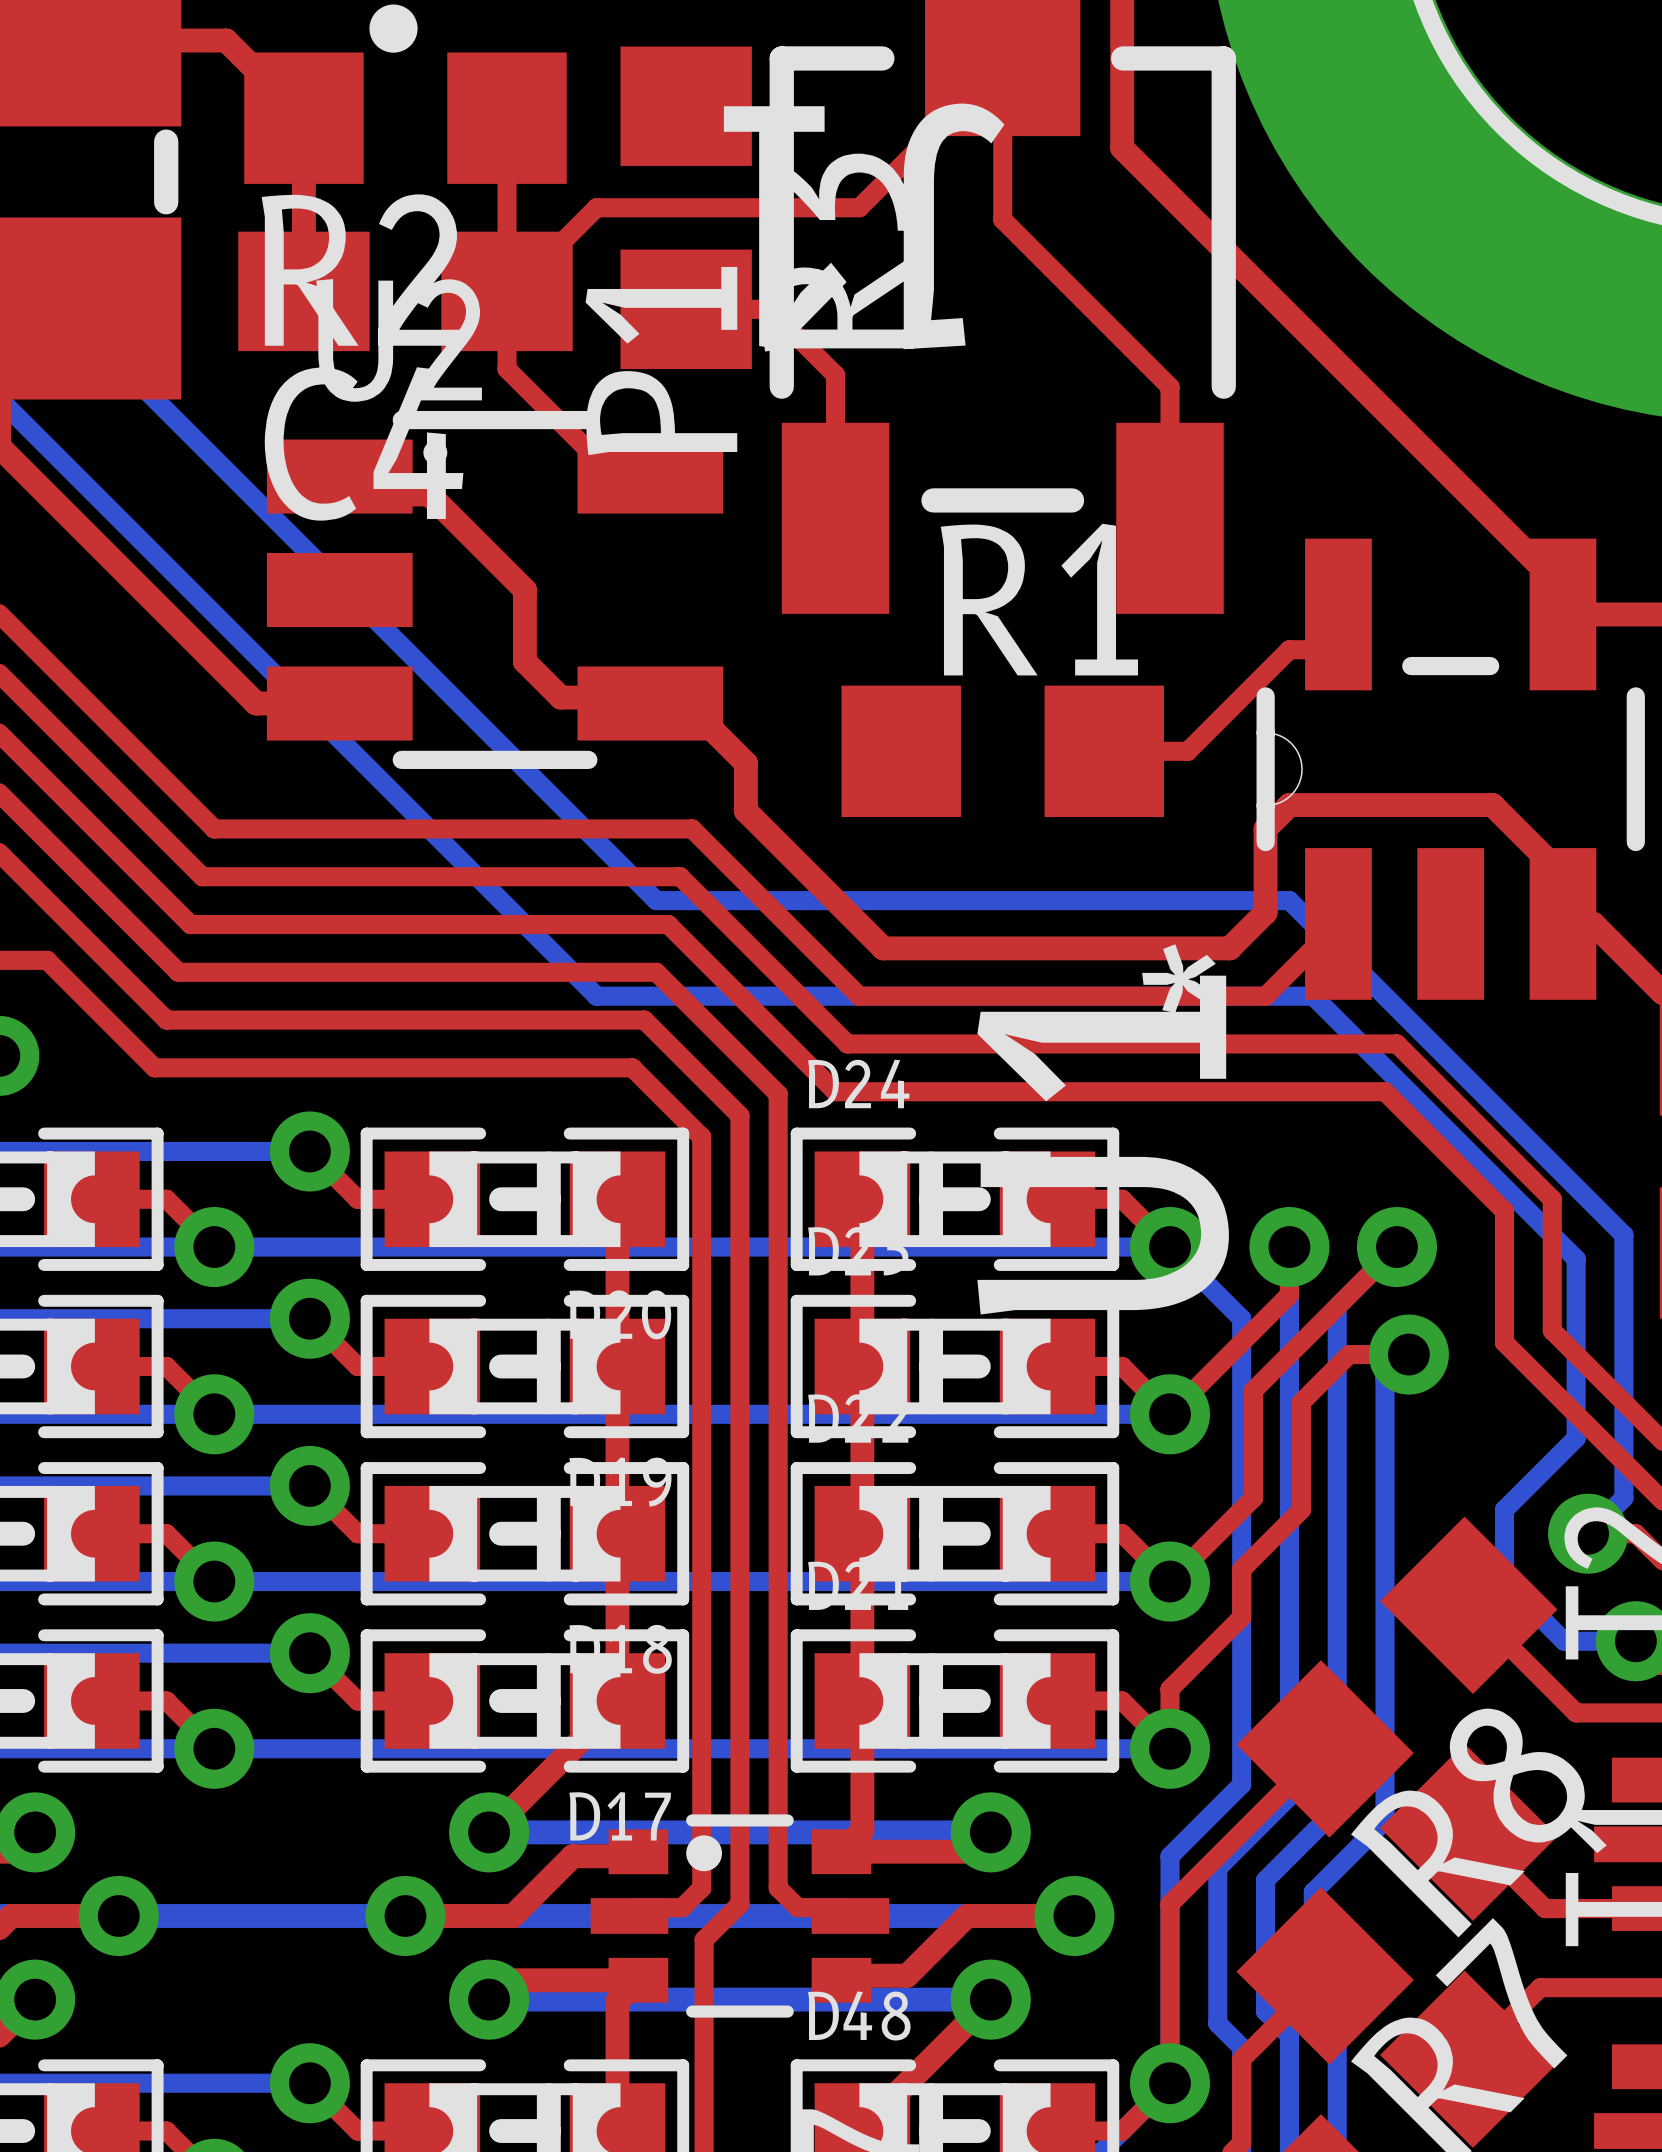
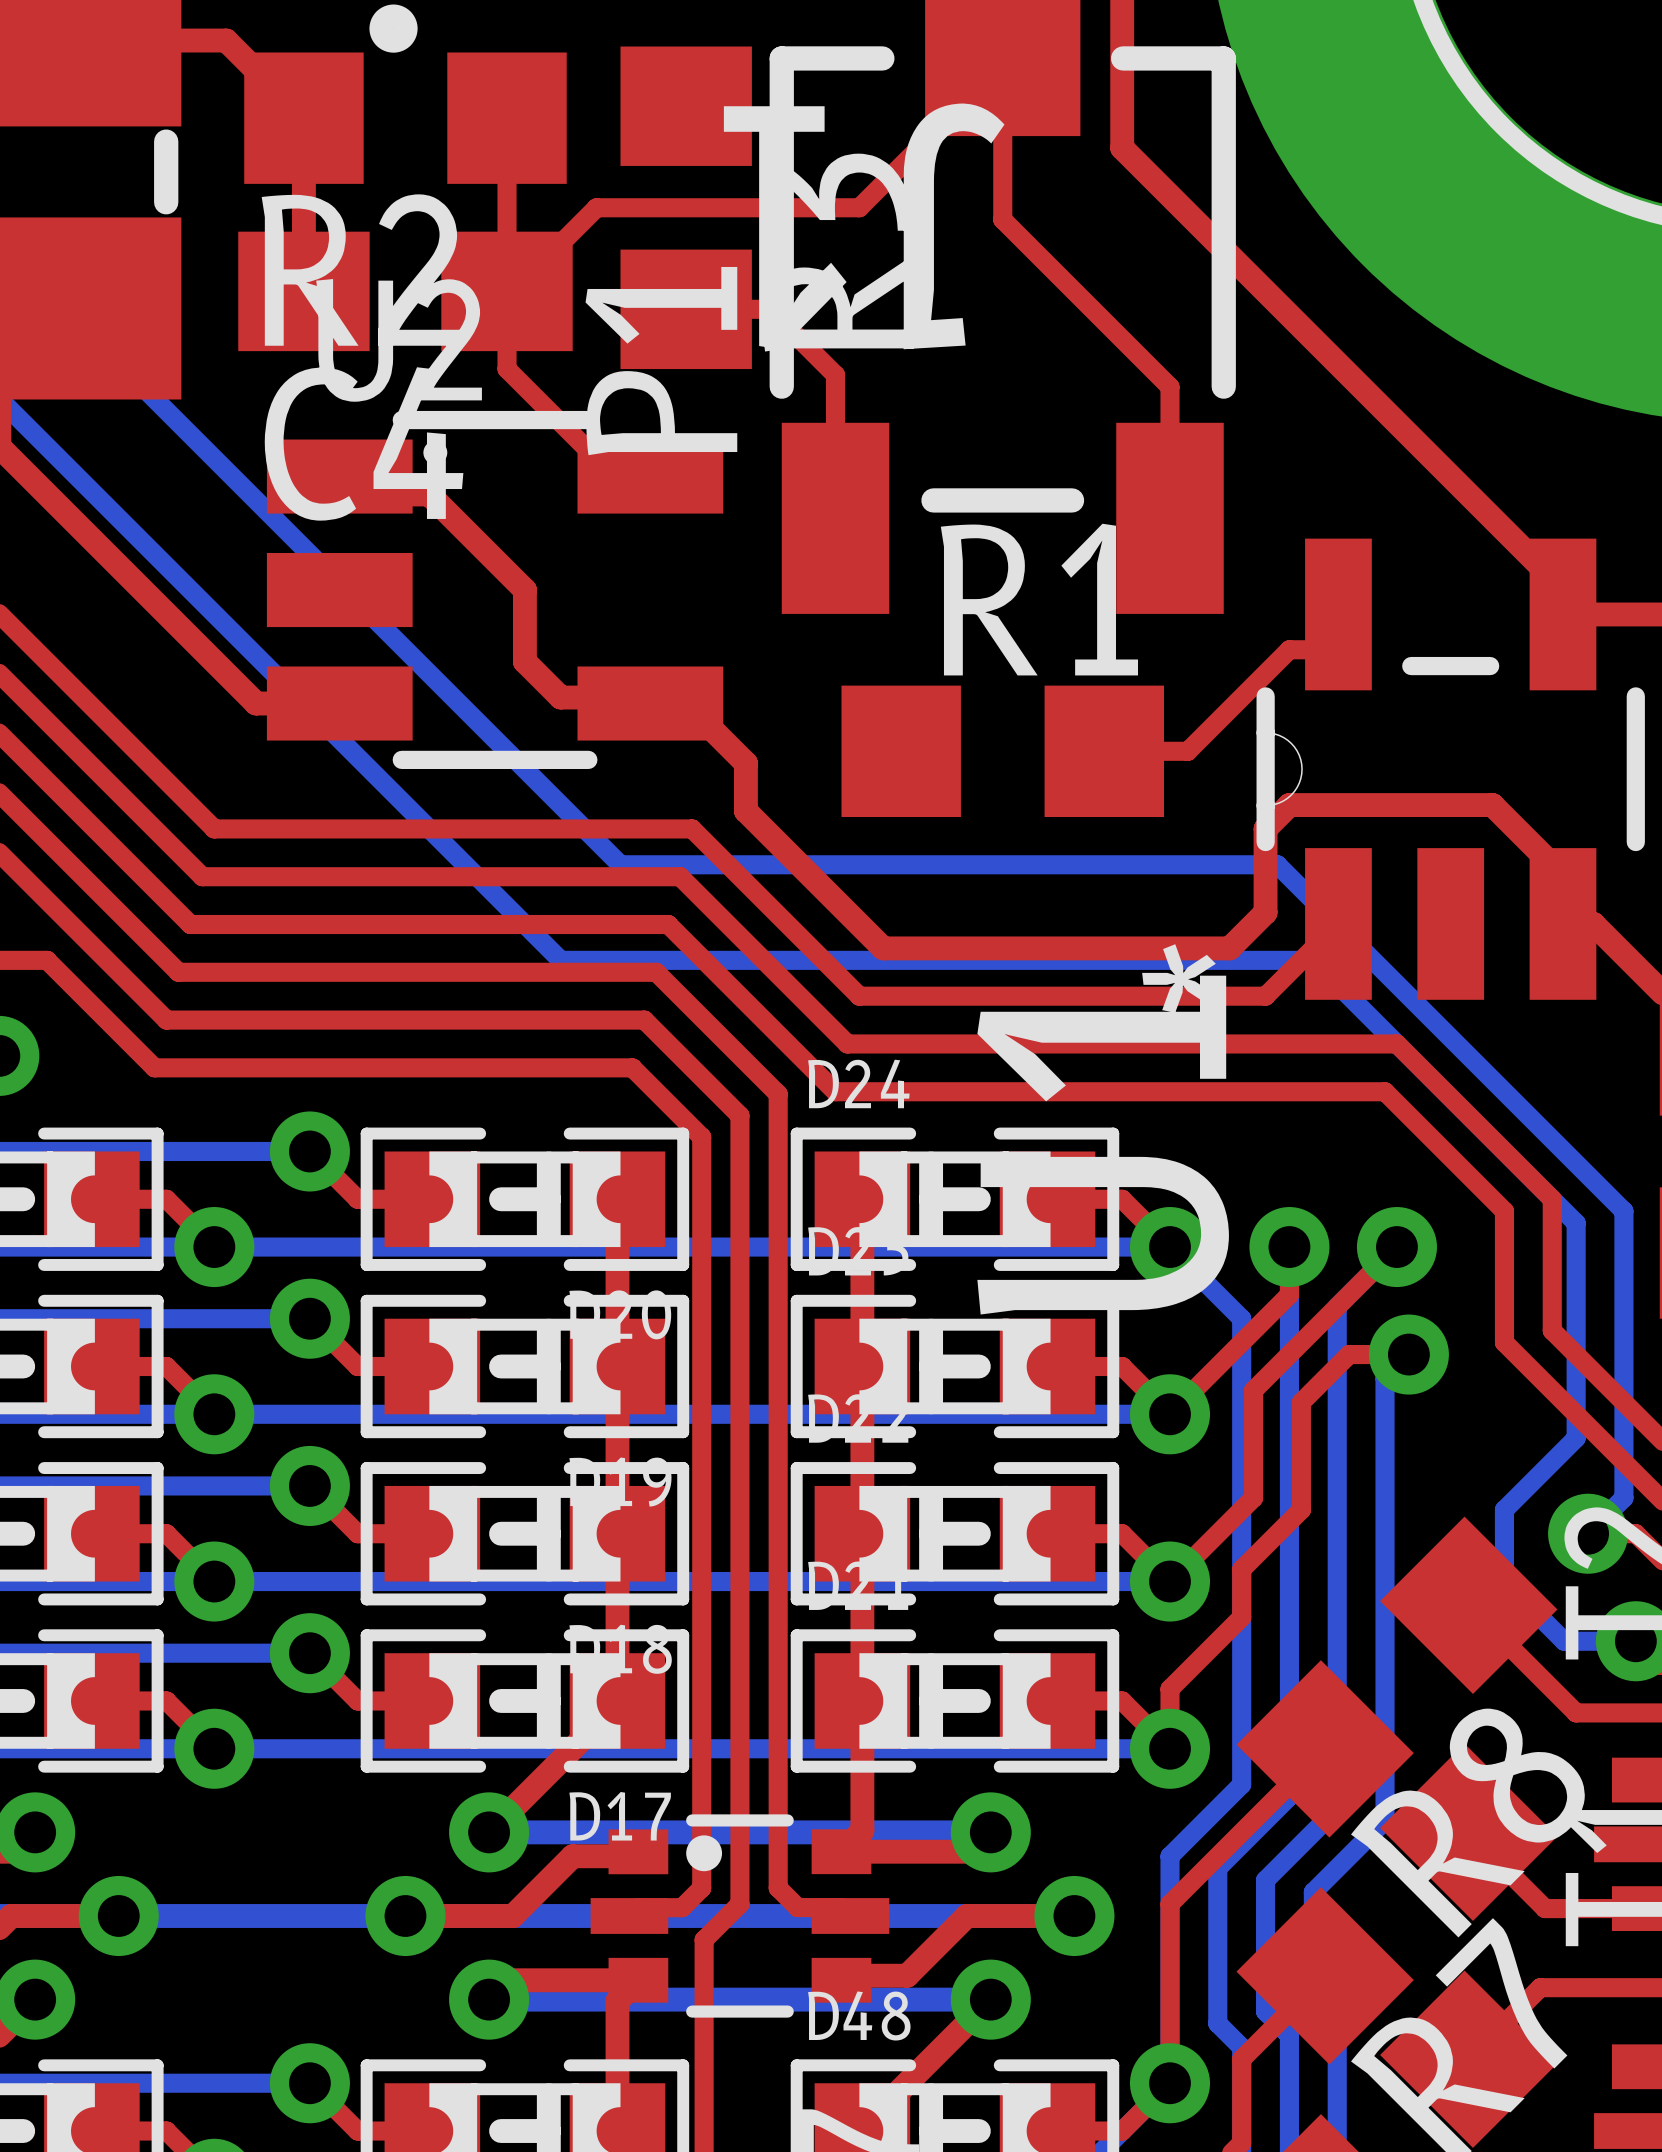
bottom track: (620, 864) (656, 900) (1289, 900) (1623, 1235) -> (620, 864) (1277, 864) (1623, 1211) (1623, 1235)
bottom track: (560, 960) (596, 996) (1313, 996) (1576, 1258) -> (560, 960) (1313, 960) (1576, 1223) (1576, 1258)

